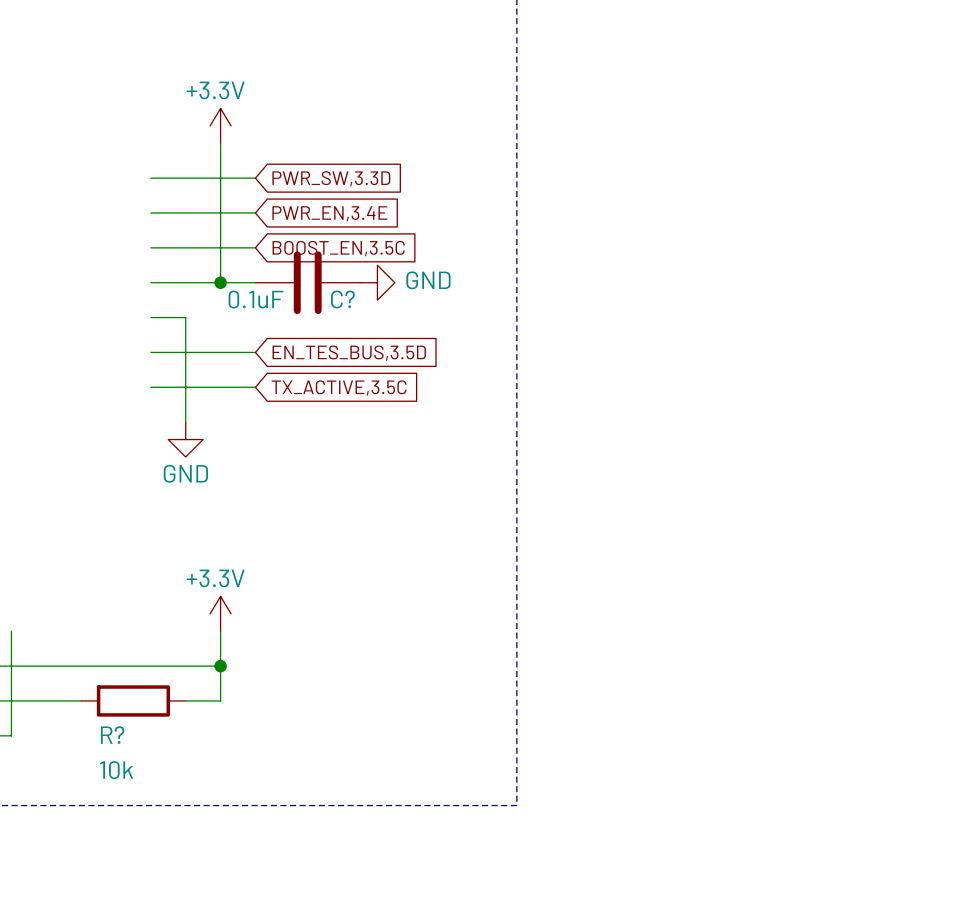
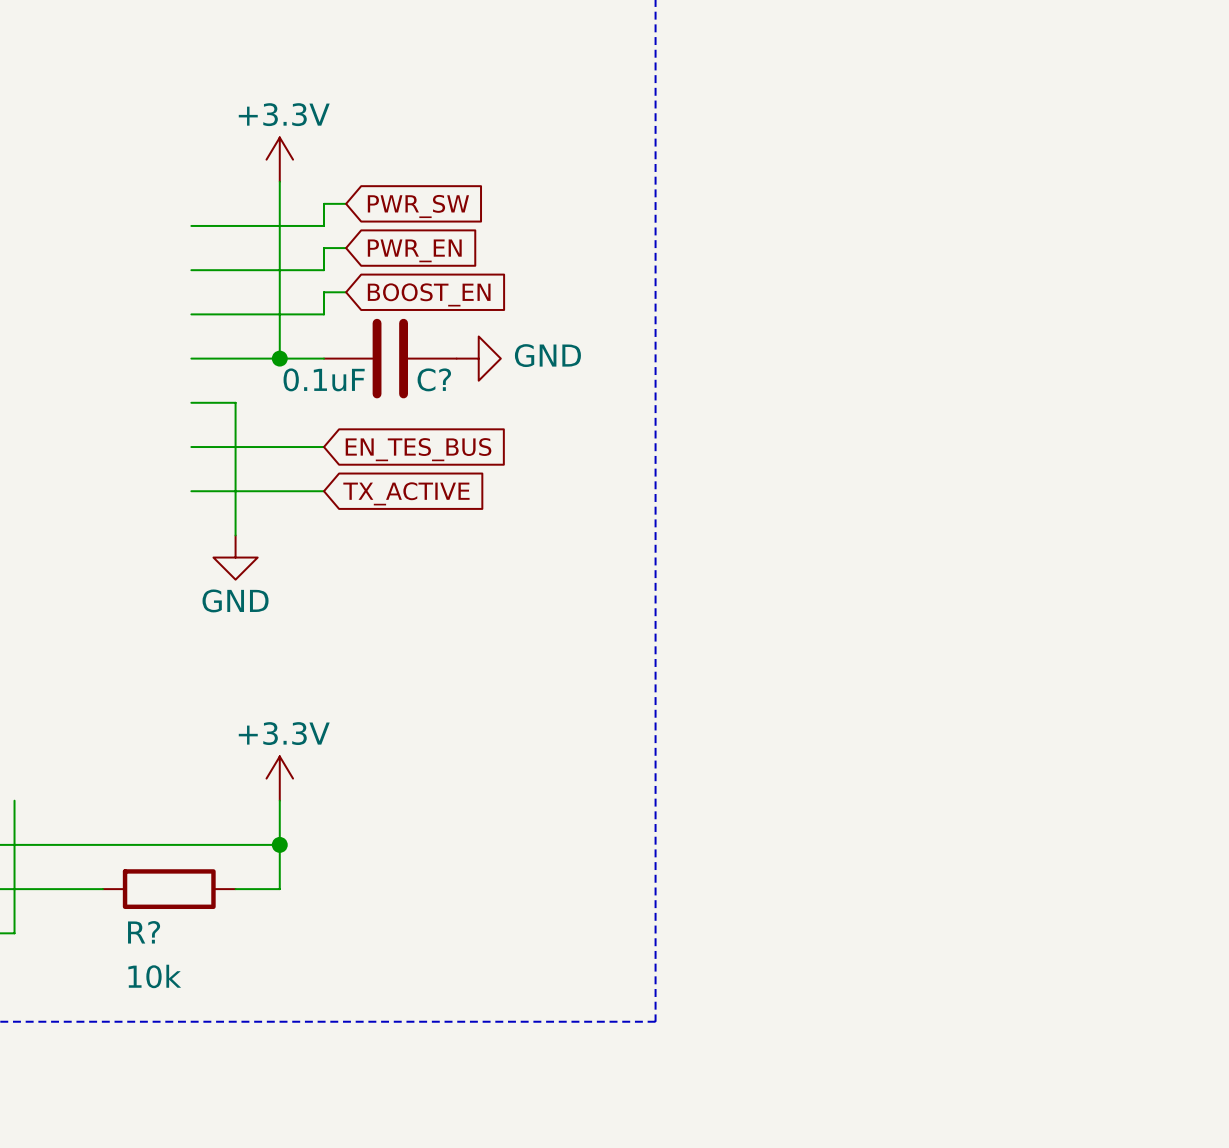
wire: none -> (346, 203) (323, 203) (323, 225)
global label: PWR_SW,3.3D (331, 178) -> PWR_SW (418, 206)
wire: none -> (346, 248) (323, 248) (323, 270)
global label: PWR_EN,3.4E (329, 213) -> PWR_EN (414, 250)
wire: none -> (346, 292) (323, 292) (323, 314)
global label: BOOST_EN,3.5C (338, 248) -> BOOST_EN (429, 294)
global label: EN_TES_BUS,3.5D (349, 353) -> EN_TES_BUS (418, 449)
global label: TX_ACTIVE,3.5C (339, 387) -> TX_ACTIVE (406, 493)

